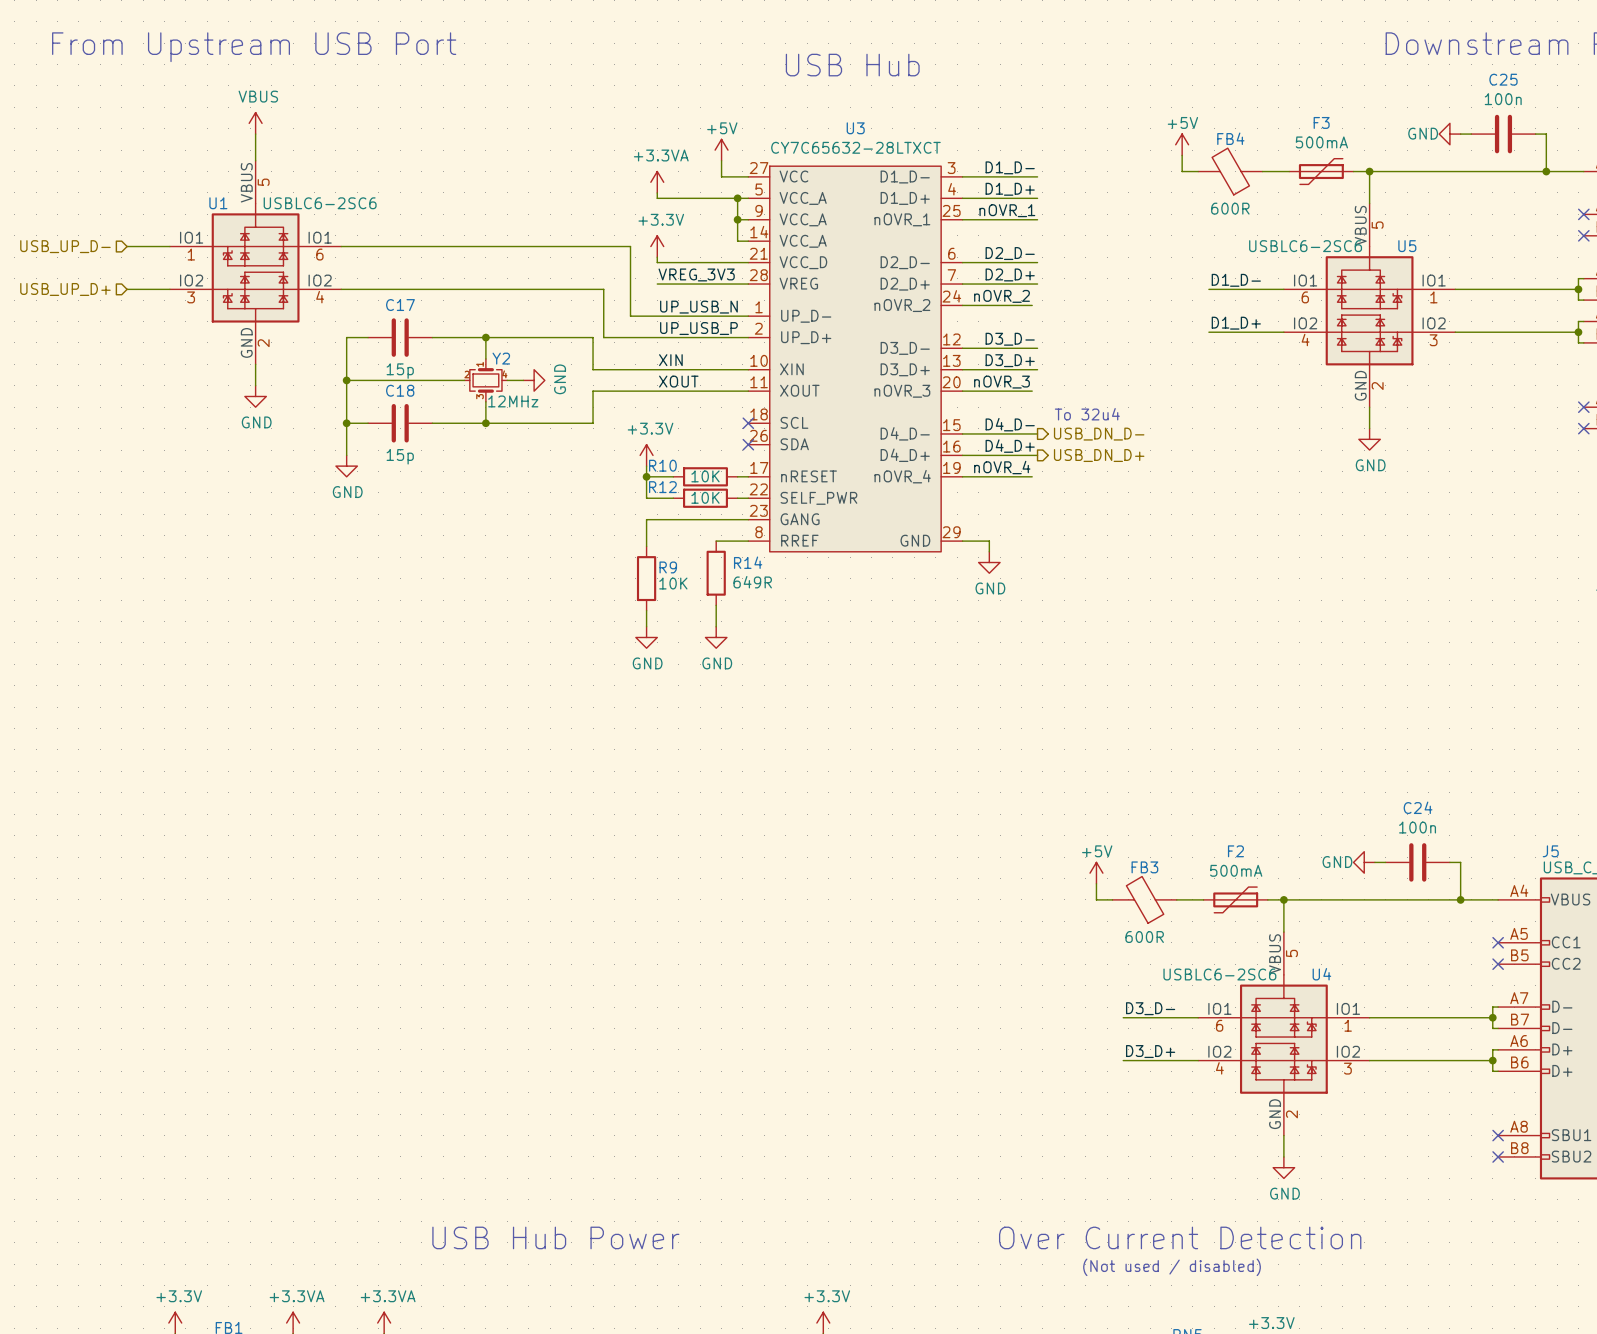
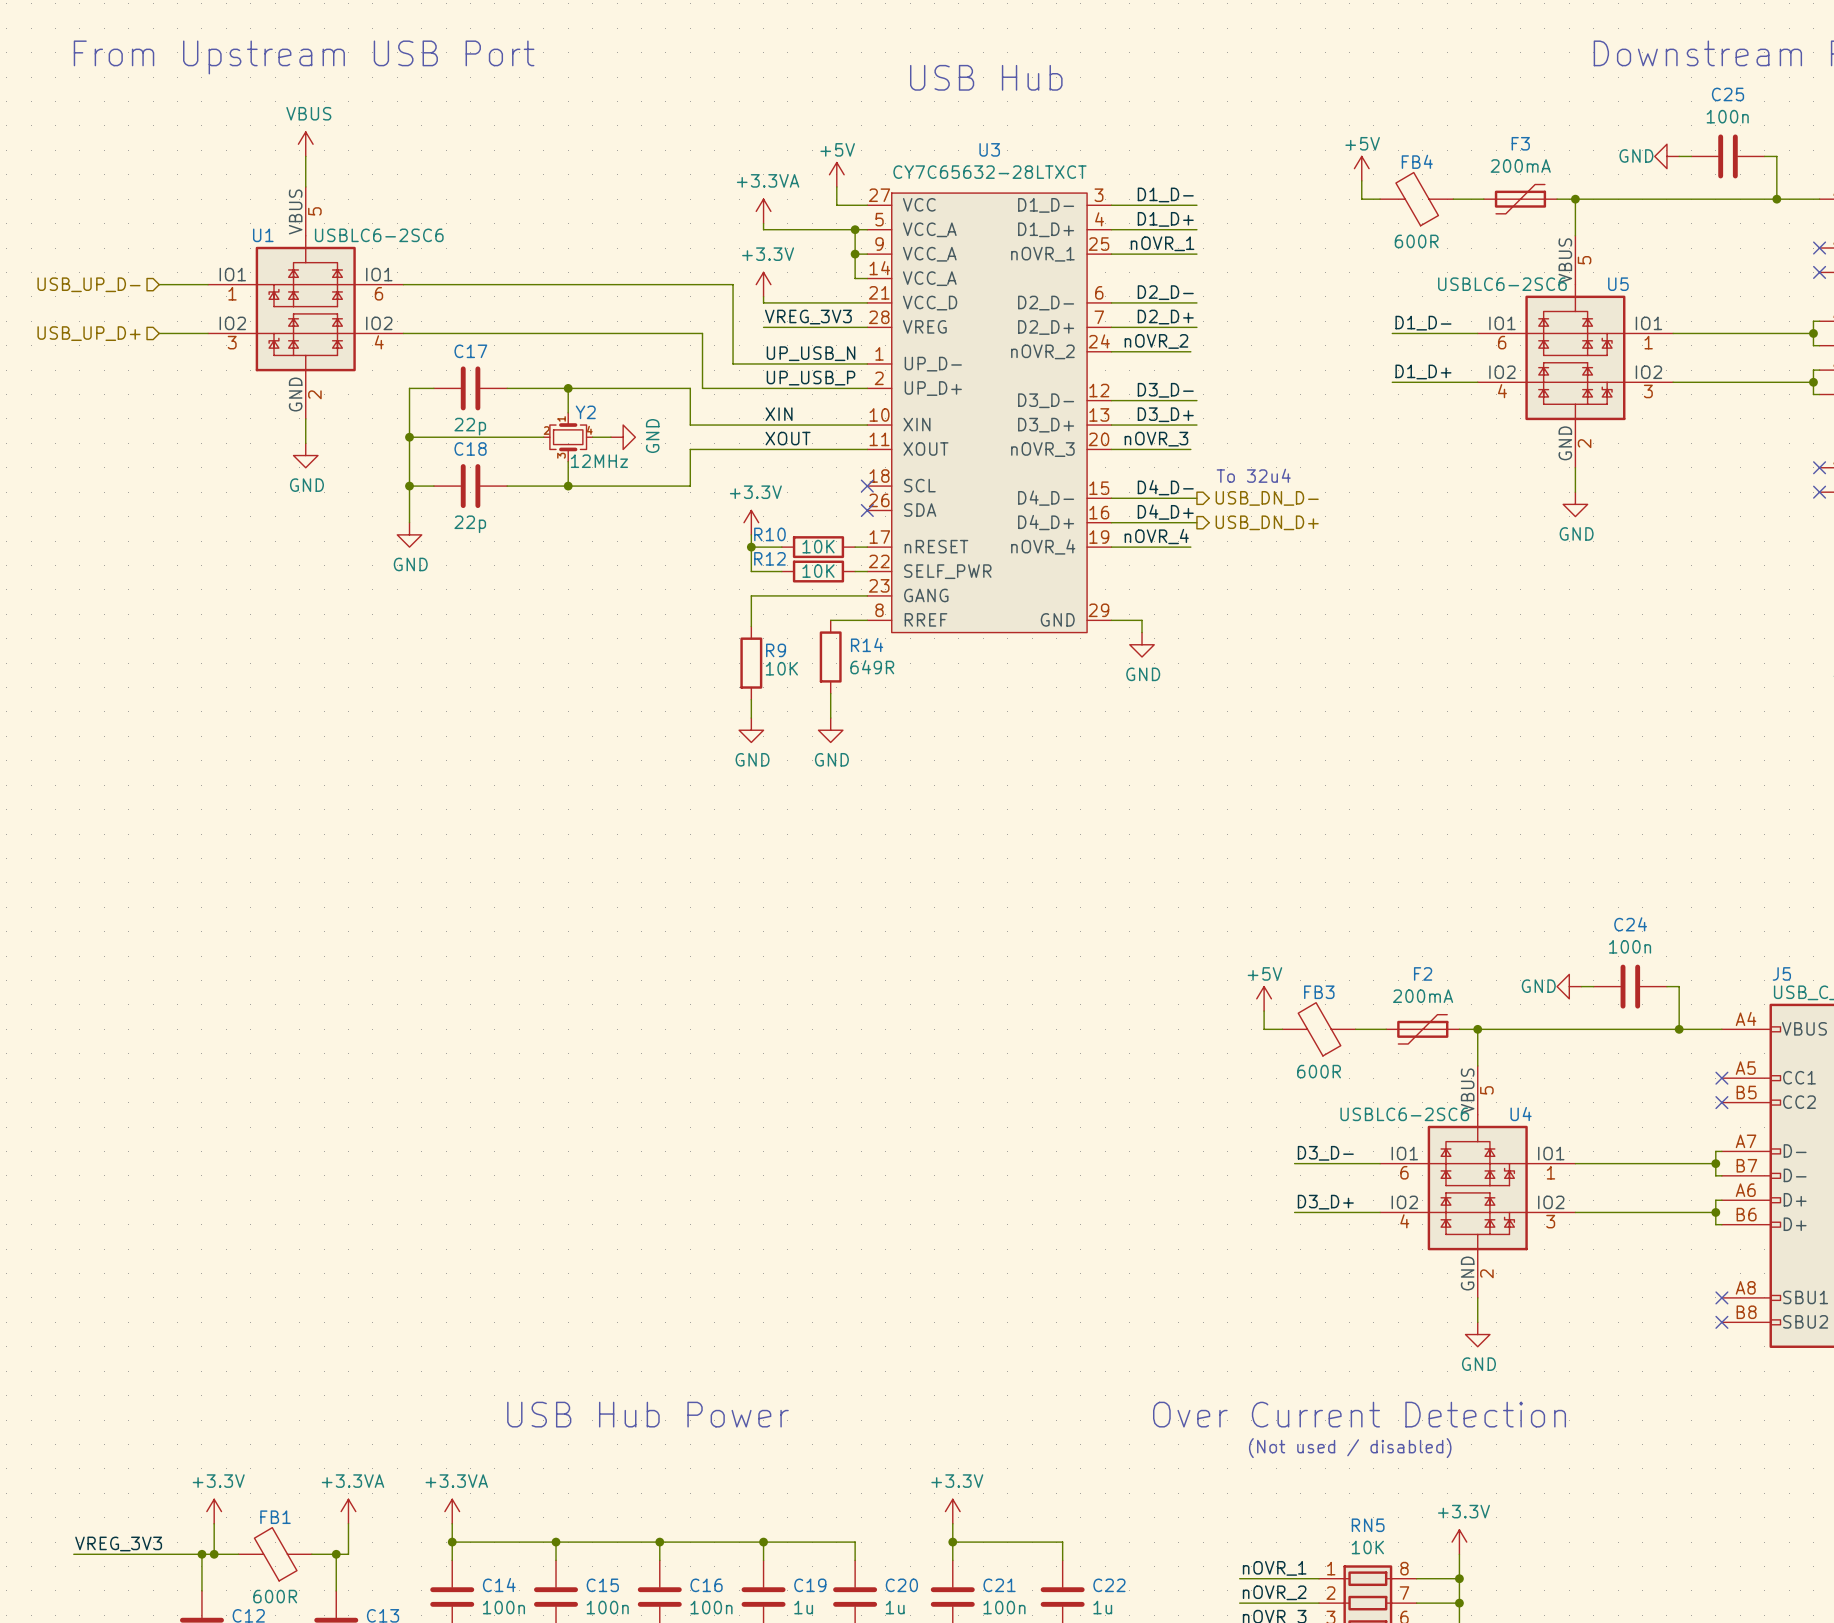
F3 value: 500mA (1321, 142) -> 200mA (1520, 166)
C17 value: 15p (400, 371) -> 22p (470, 426)
C18 value: 15p (400, 456) -> 22p (470, 524)
F2 value: 500mA (1236, 870) -> 200mA (1423, 996)

